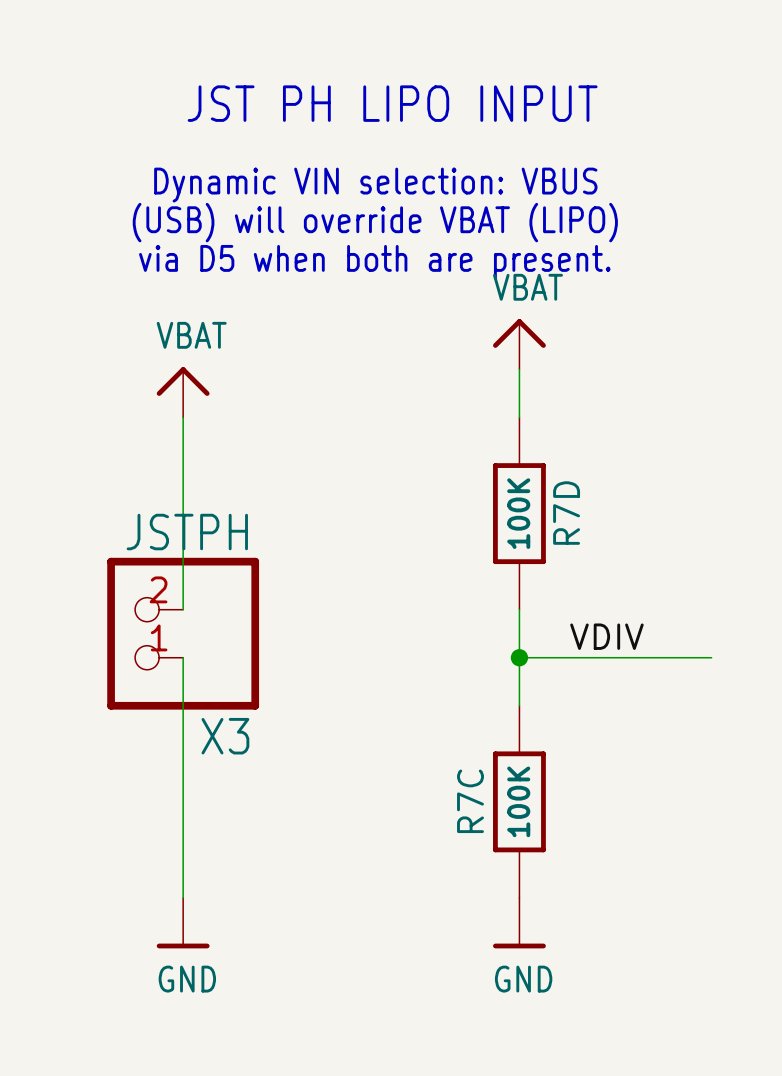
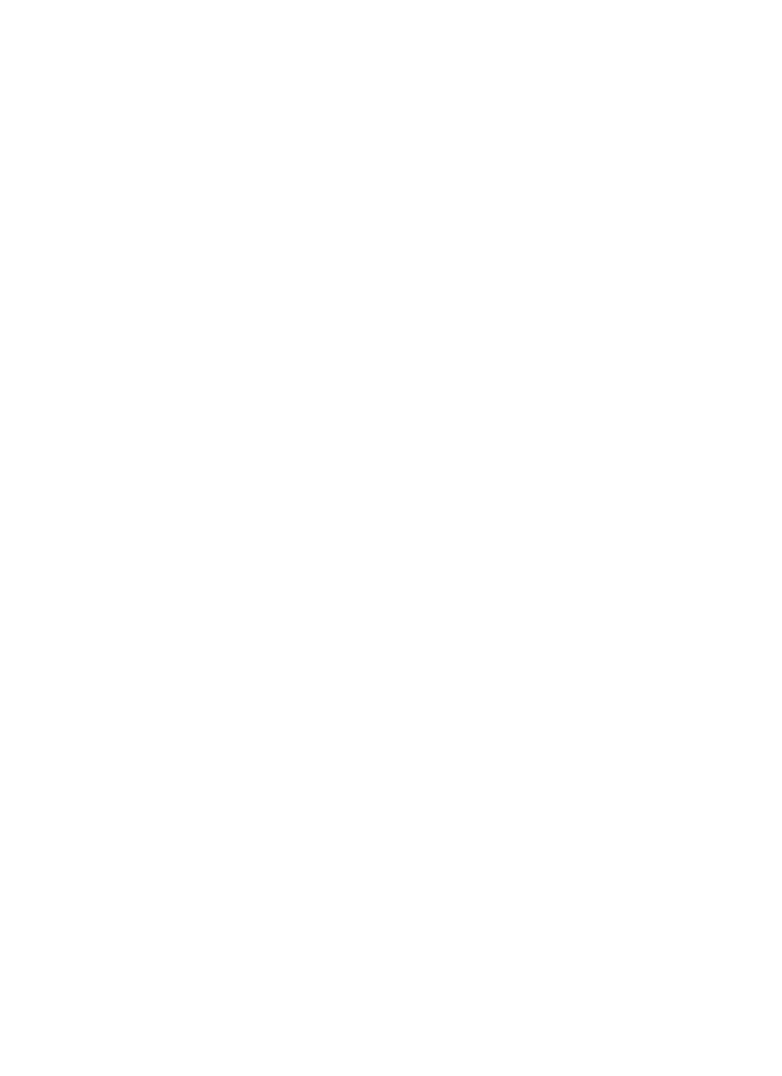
text: JST PH LIPO INPUT (392, 103) -> none
text: Dynamic VIN selection: VBUS (375, 185) -> none
text: (USB) will override VBAT (LIPO) (375, 222) -> none
text: via D5 when both are present. (374, 262) -> none
power symbol: VBAT (519, 344) -> none
wire: (519, 369) (519, 417) -> none
power symbol: VBAT (183, 392) -> none
wire: (183, 417) (183, 609) -> none
R7D: 100K (519, 513) -> none
wire: (519, 609) (519, 705) -> none
X3: JSTPH (183, 633) -> none
label: VDIV (606, 636) -> none
wire: (183, 657) (183, 897) -> none
wire: (519, 657) (711, 657) -> none
junction: (519, 657) -> none
R7C: 100K (519, 801) -> none
power symbol: GND (183, 923) -> none
power symbol: GND (519, 923) -> none

